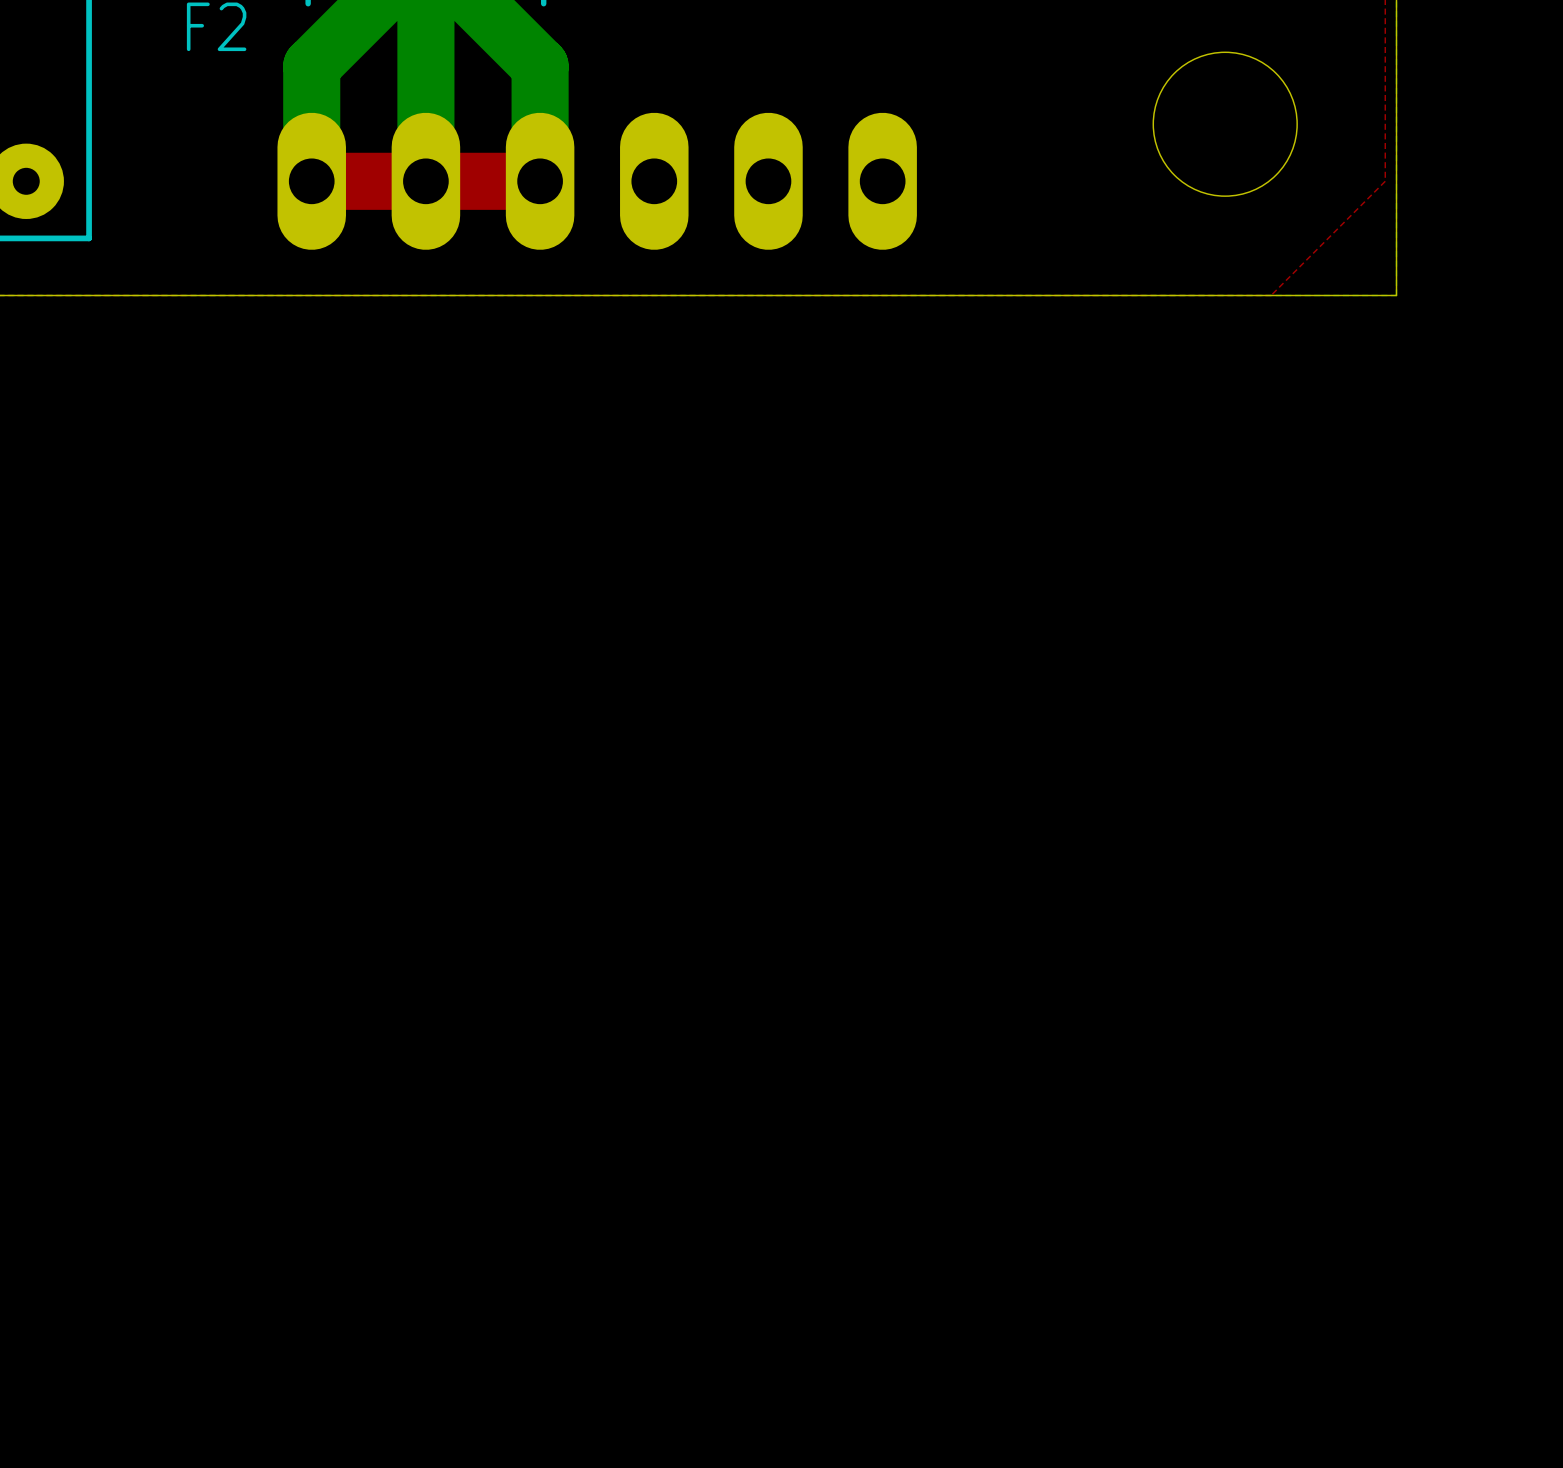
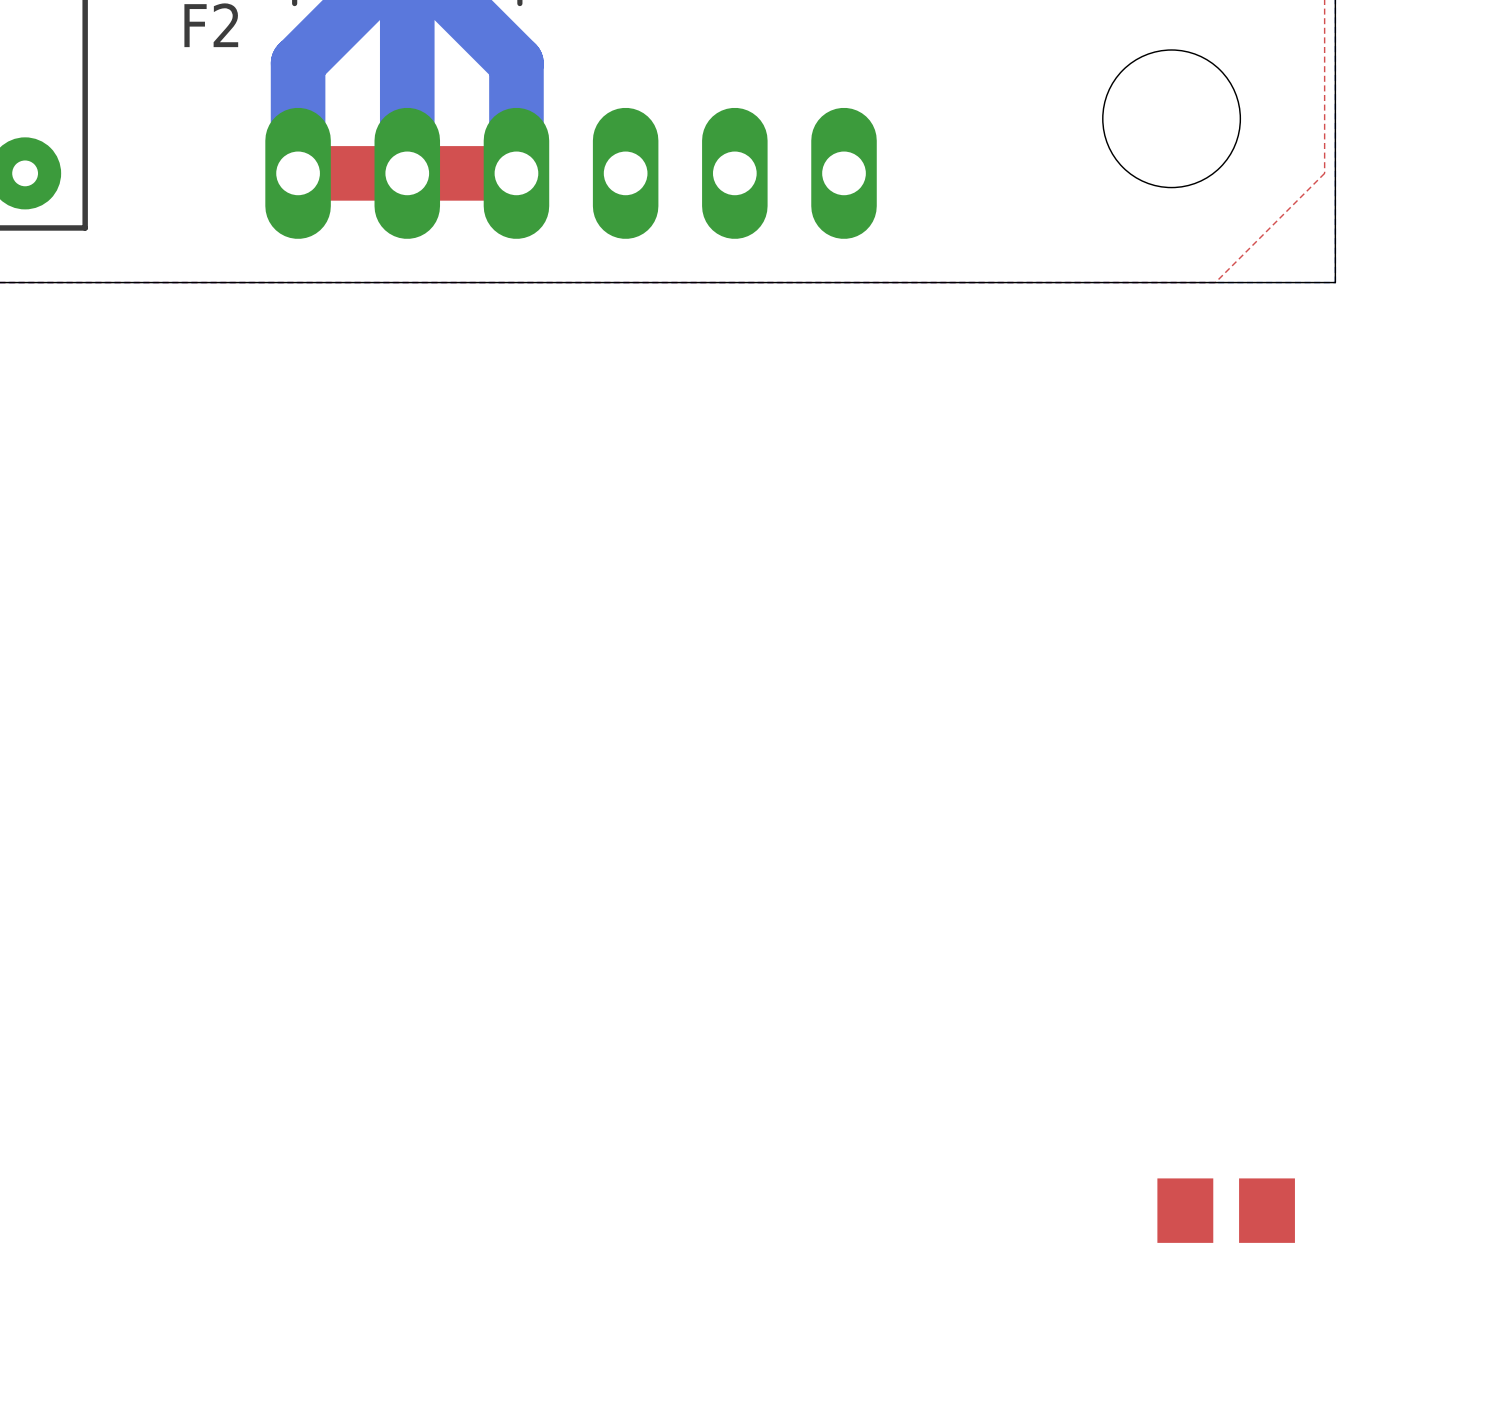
part: none -> (1226, 1210)

